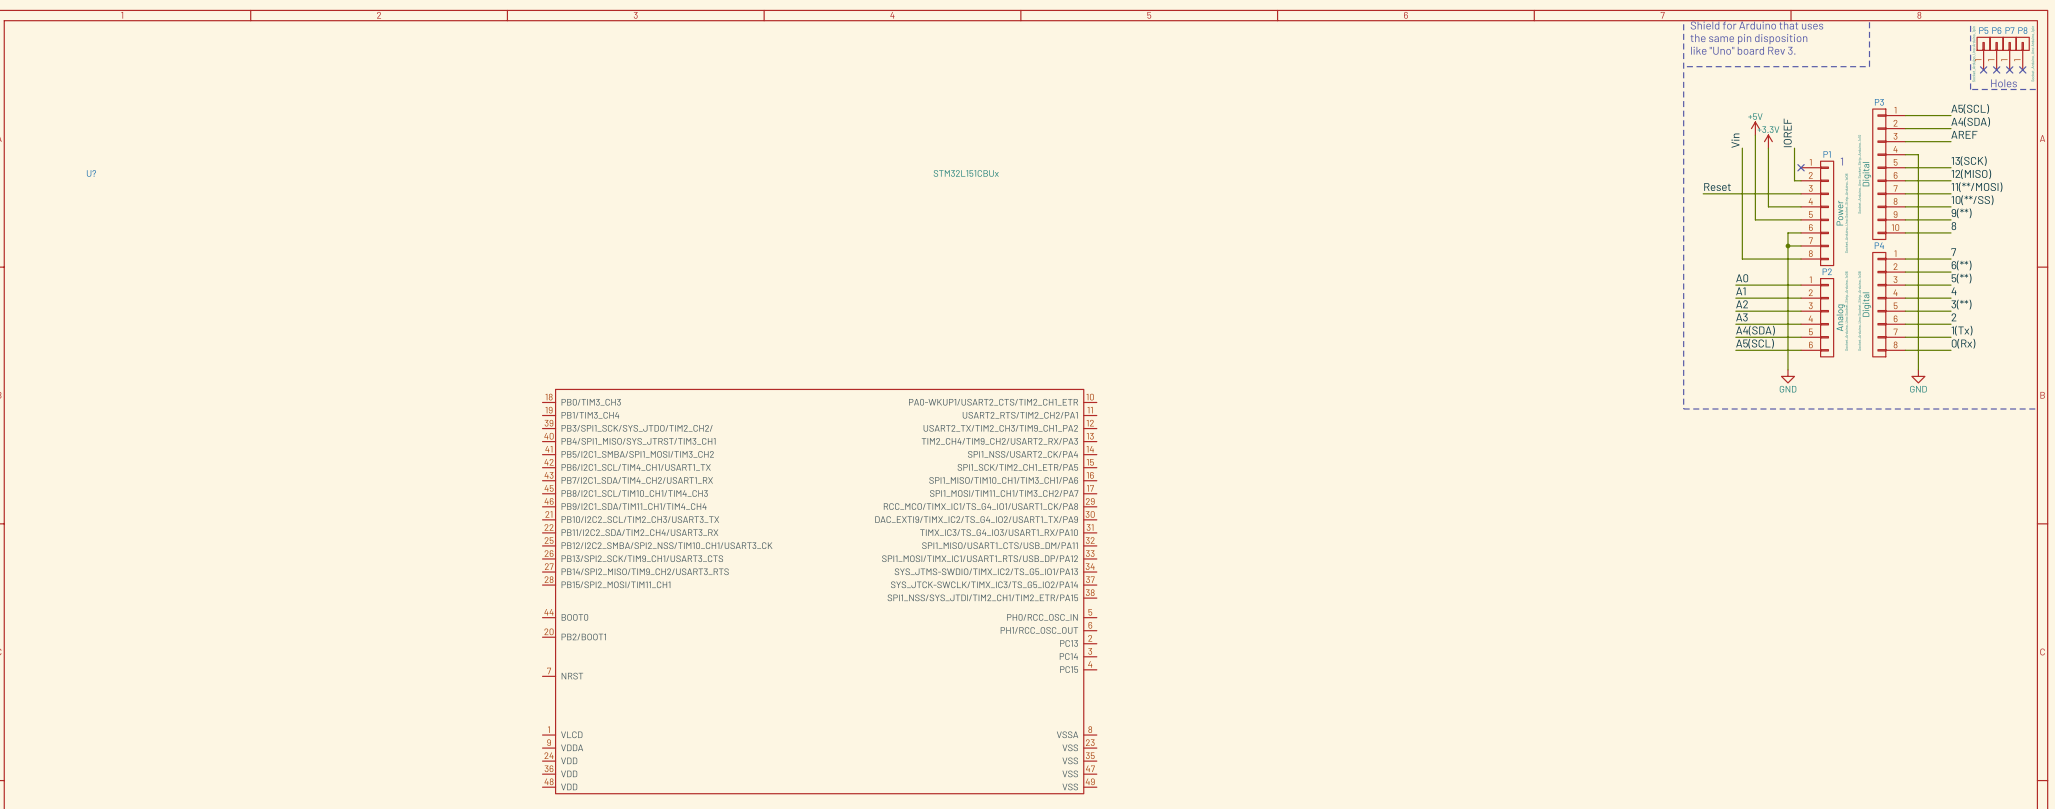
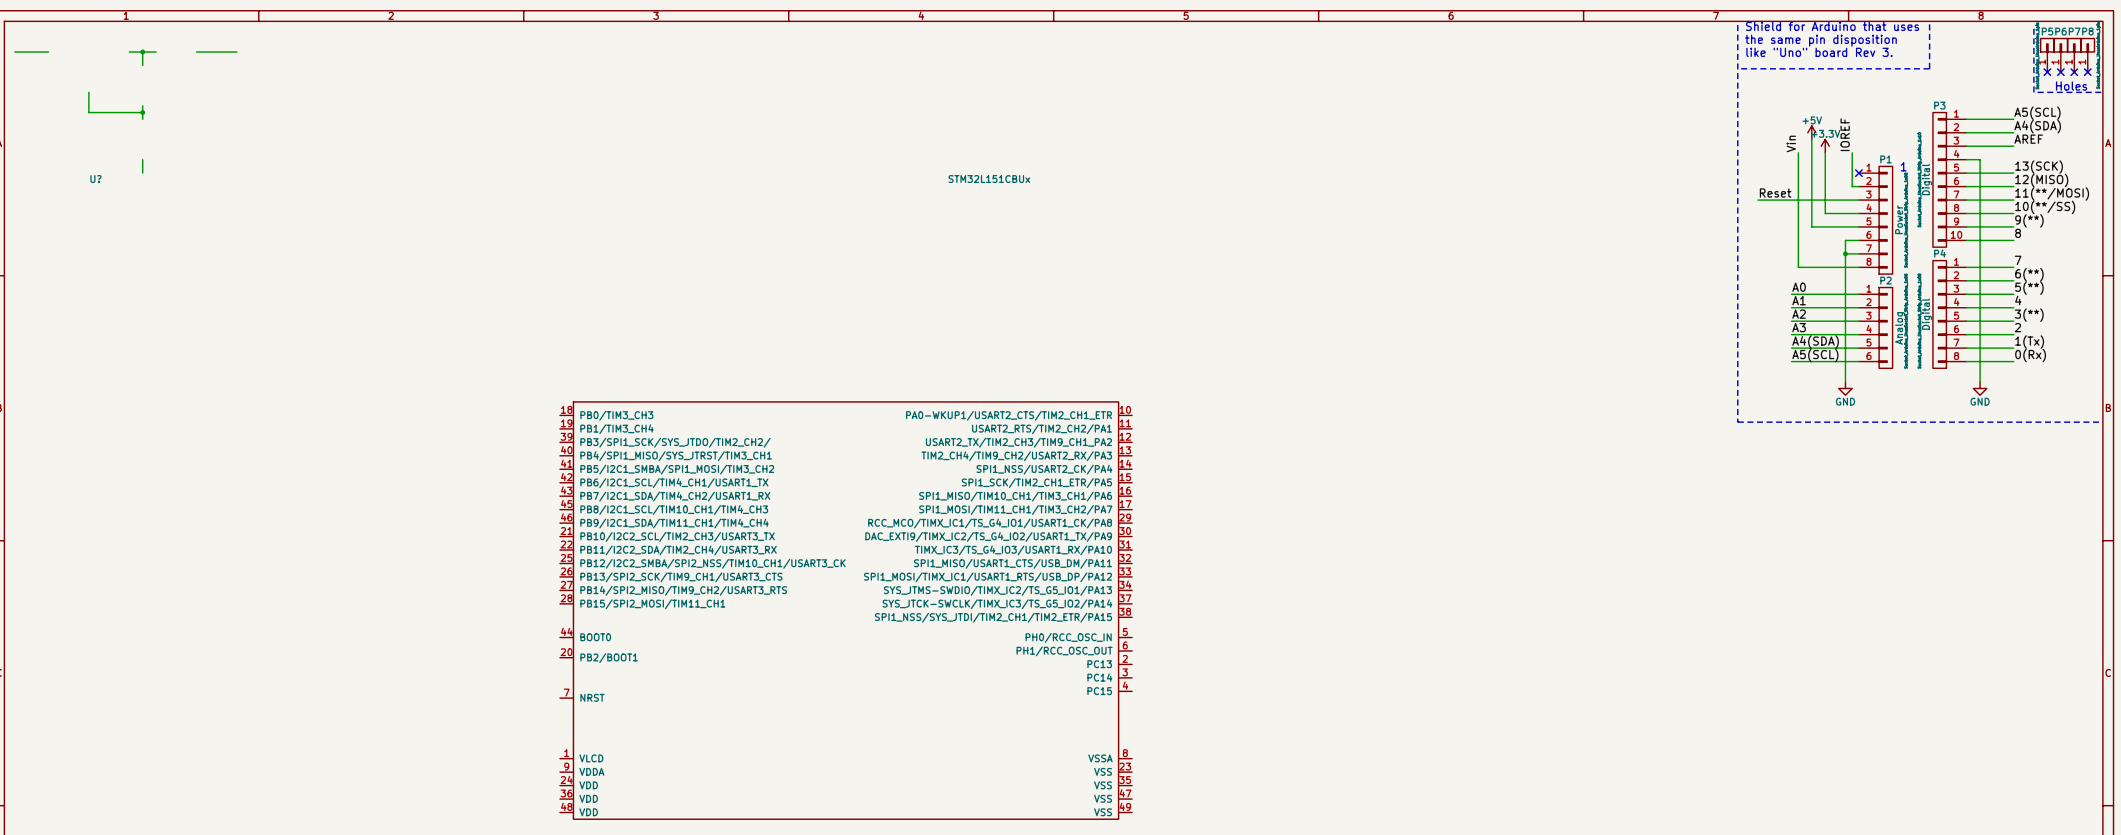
wire: none -> (14, 51) (48, 51)
wire: none -> (129, 51) (156, 51)
wire: none -> (142, 51) (142, 65)
junction: none -> (142, 51)
wire: none -> (196, 51) (236, 51)
wire: none -> (88, 92) (88, 112) (142, 112)
wire: none -> (142, 105) (142, 119)
junction: none -> (142, 112)
wire: none -> (142, 159) (142, 173)

